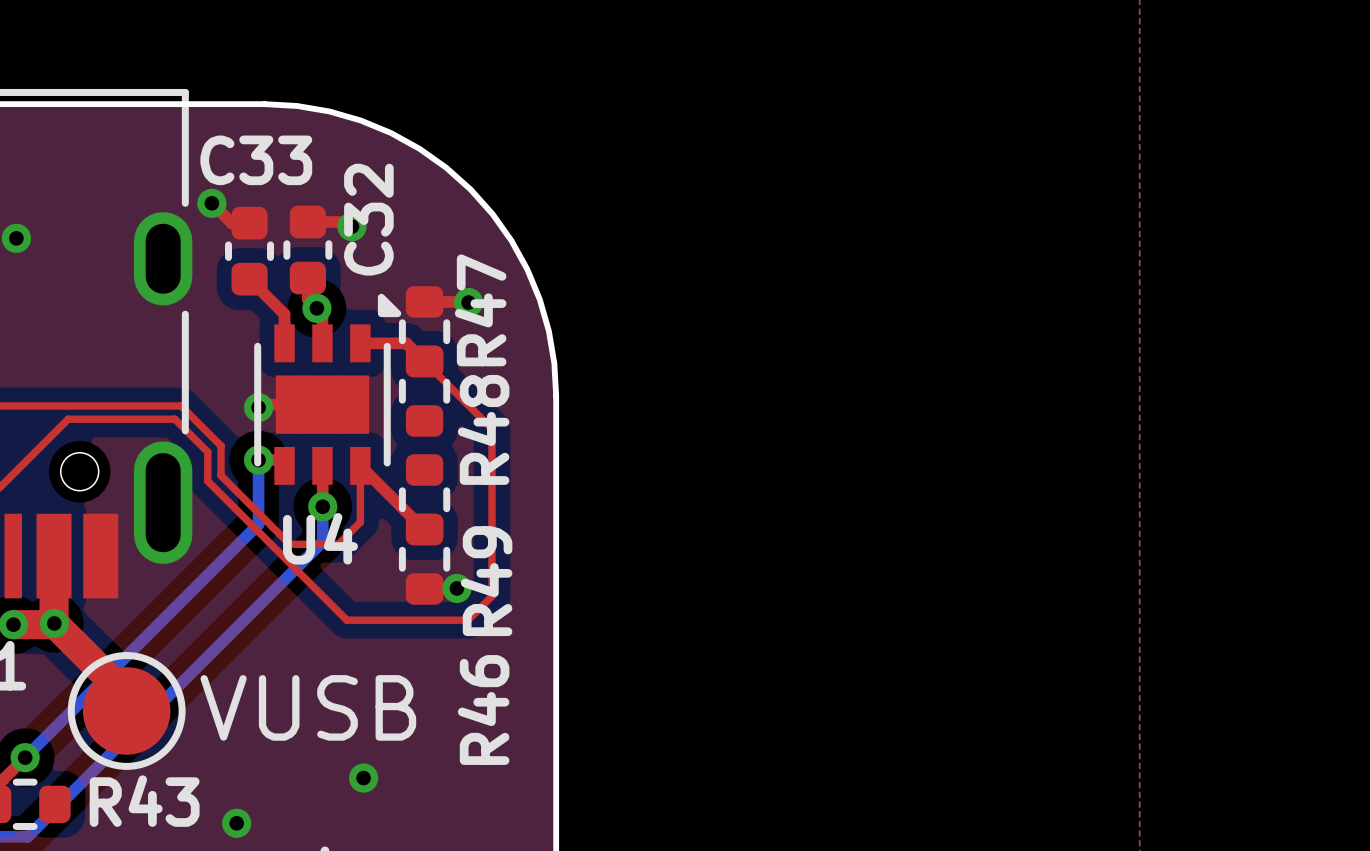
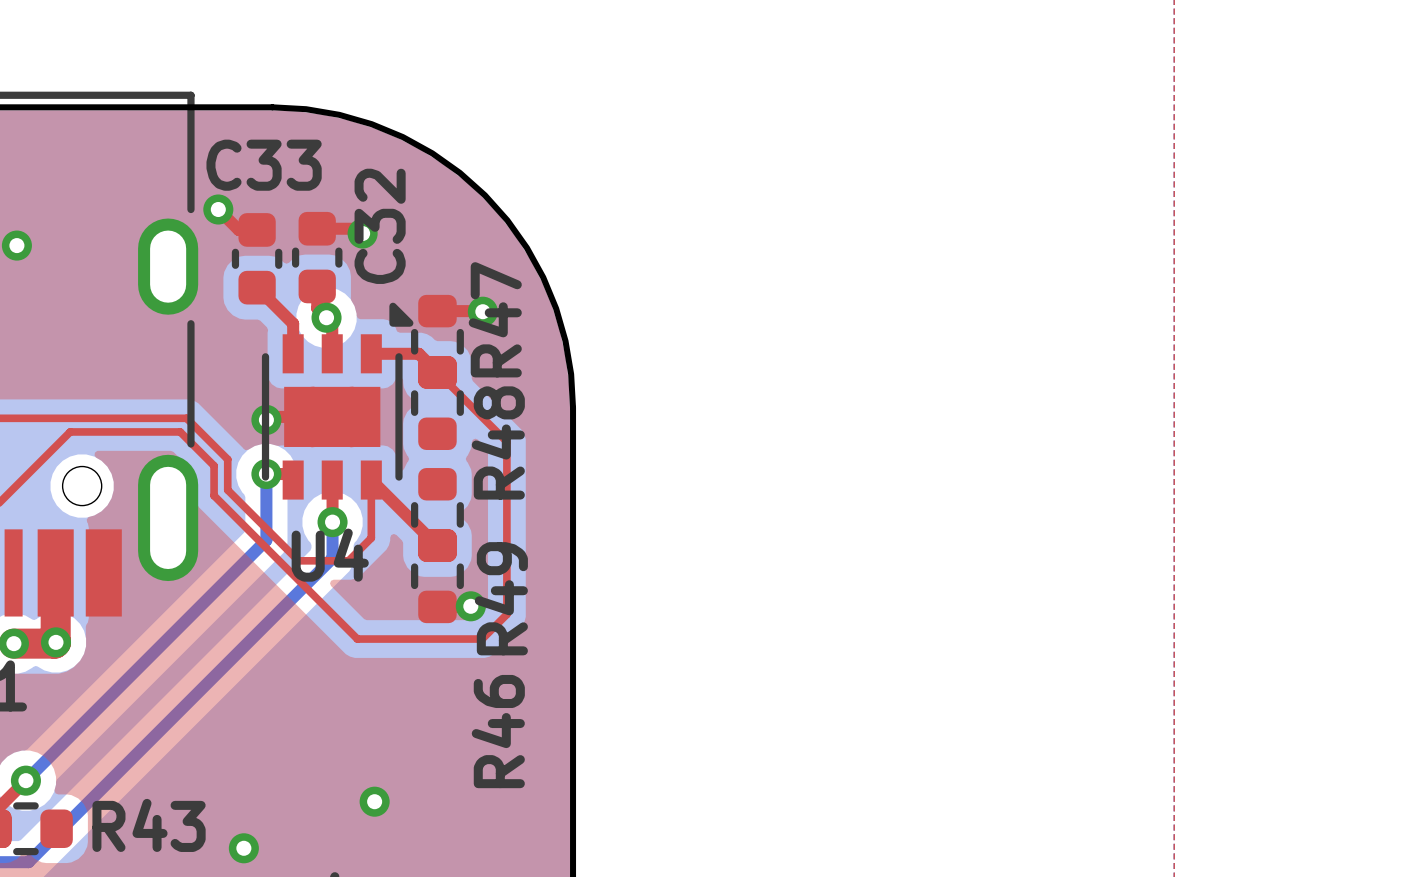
top track: (54, 623) (126, 695) -> none
text: VUSB (308, 707) -> none
part: (126, 710) -> none

